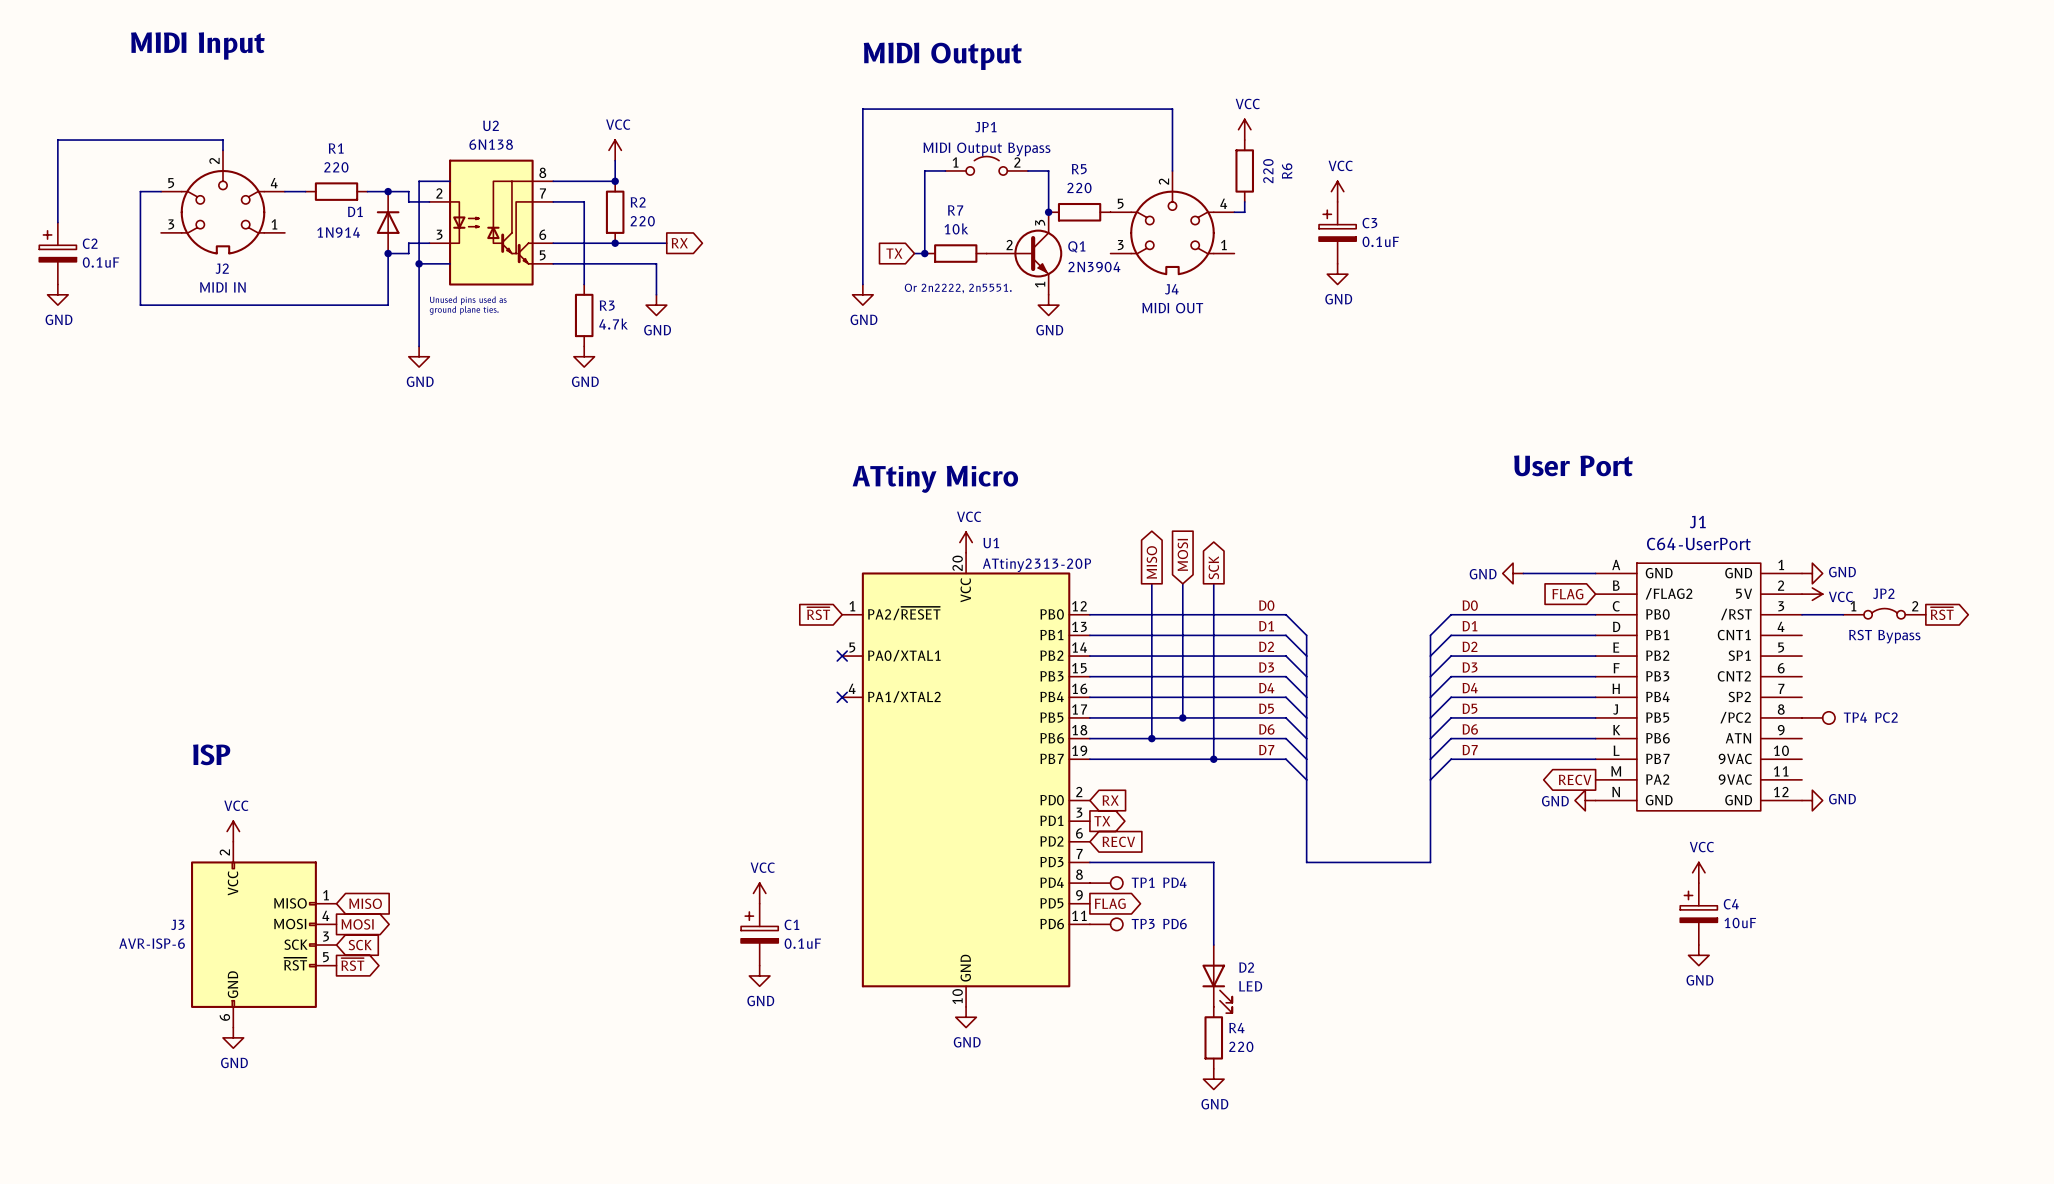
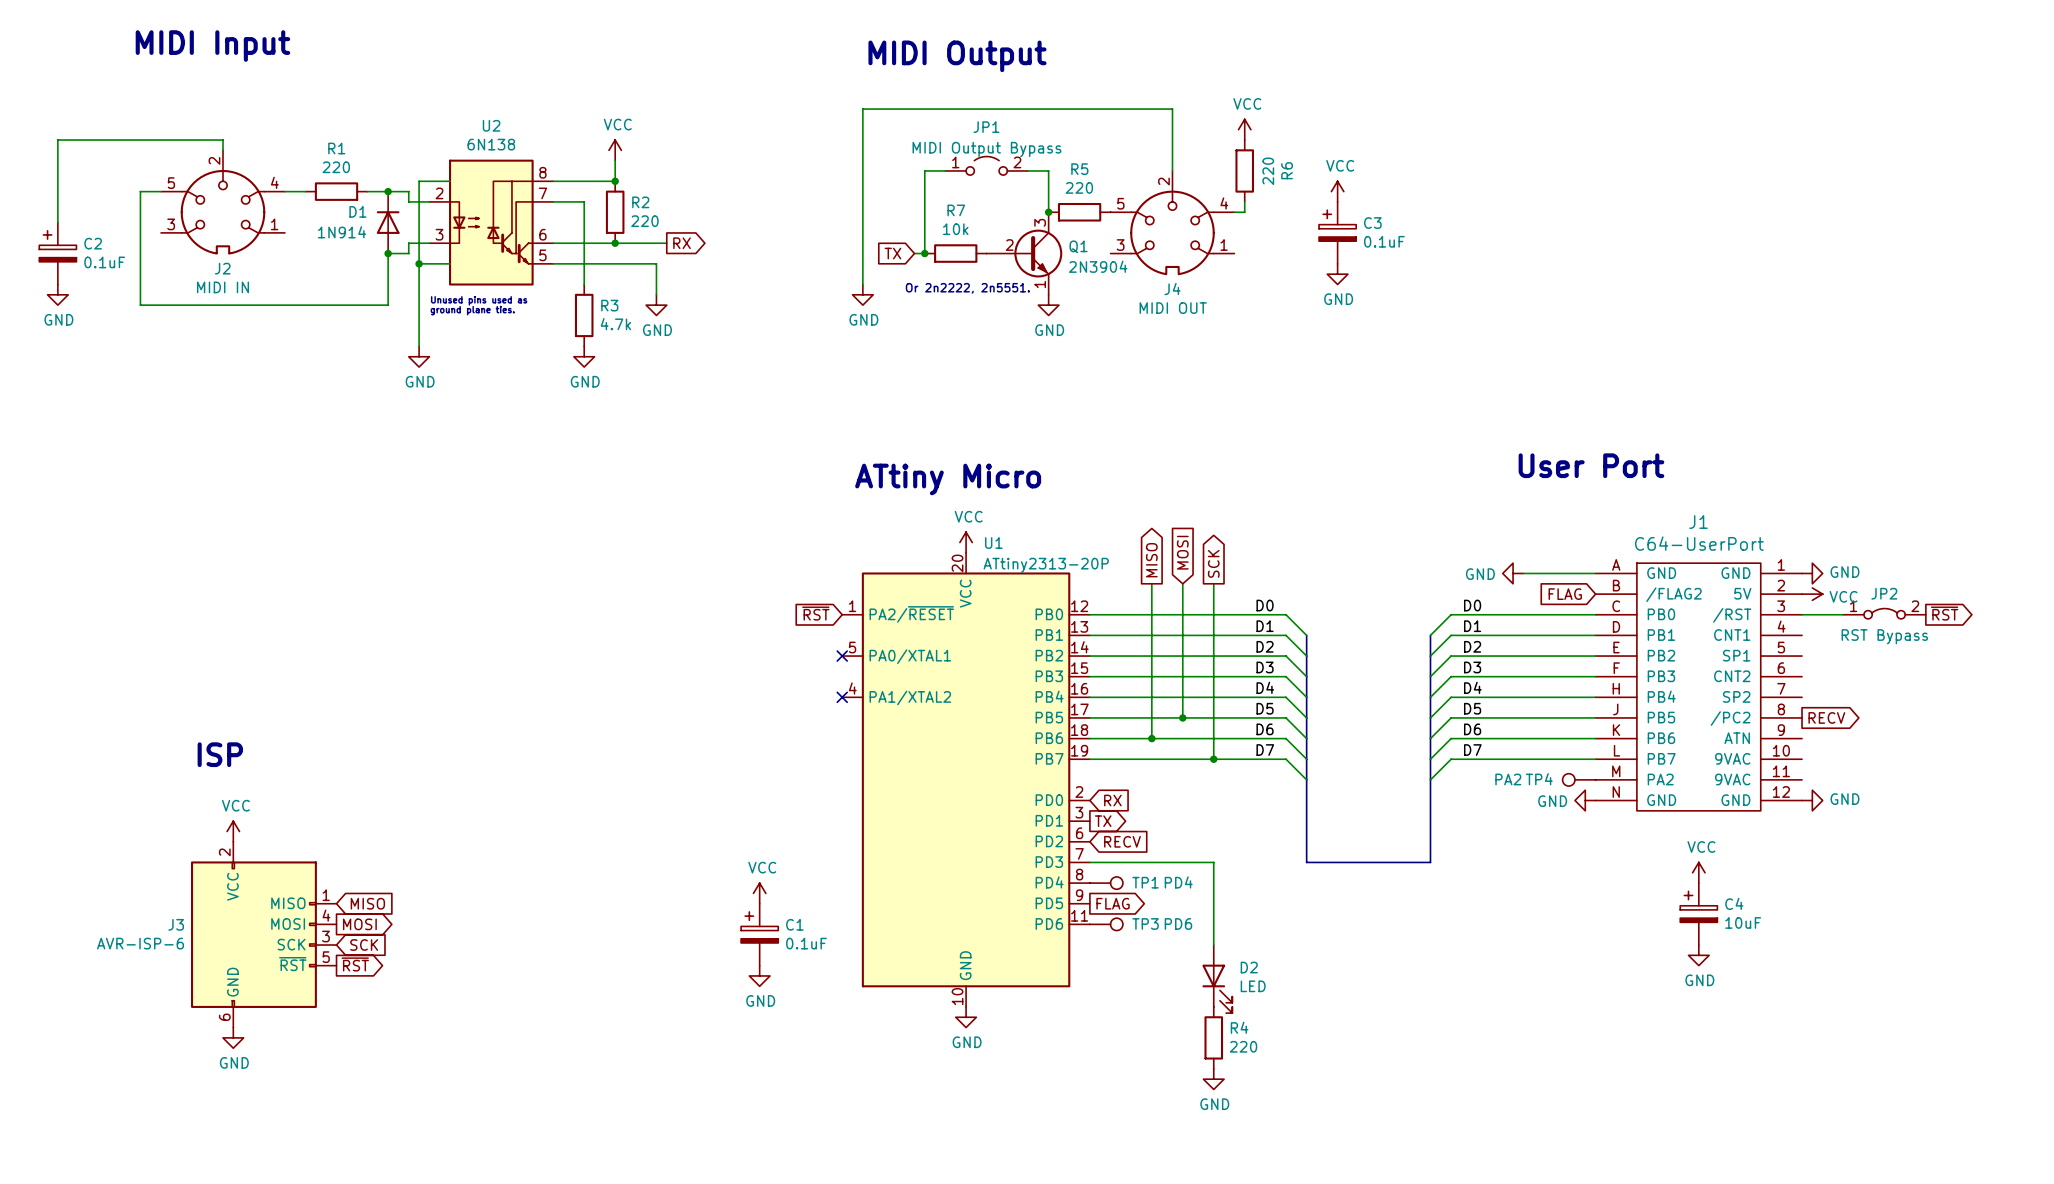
TP4 position: (1818, 717) -> (1579, 779)
TP4 rotation: 0° (1828, 717) -> 180° (1568, 779)
TP4 value: PC2 (1886, 717) -> PA2 (1508, 779)
global label: none -> RECV (1826, 717)
global label: RECV (1575, 779) -> none

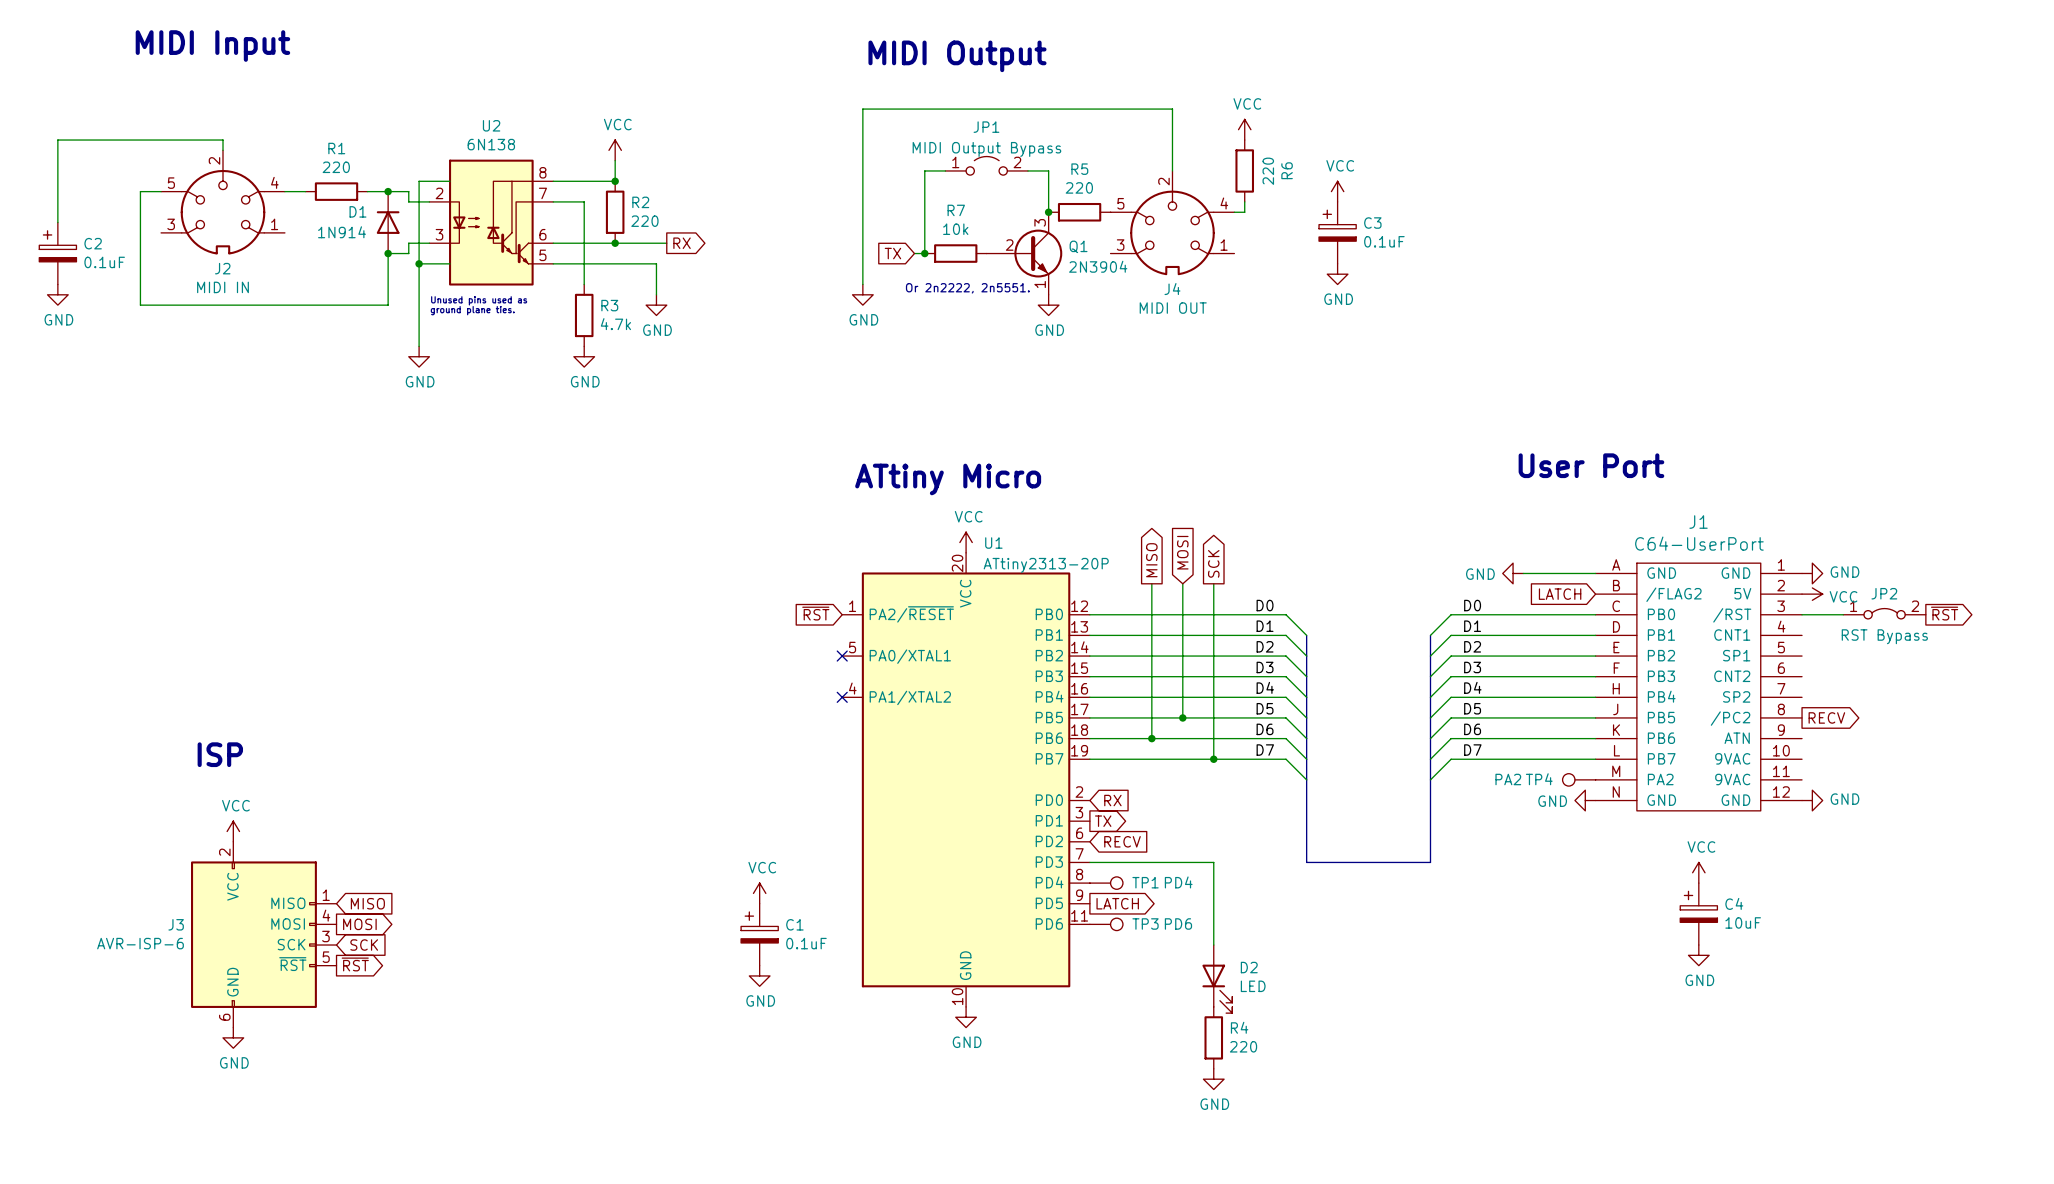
global label: FLAG (1565, 594) -> LATCH (1560, 594)
global label: FLAG (1113, 903) -> LATCH (1117, 903)

